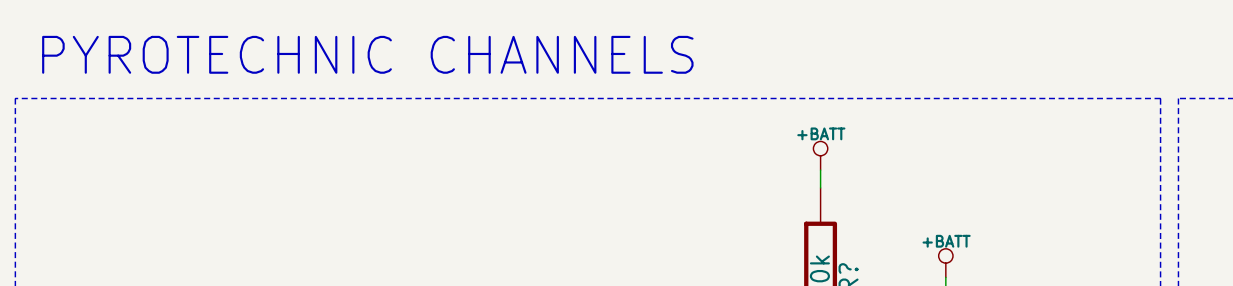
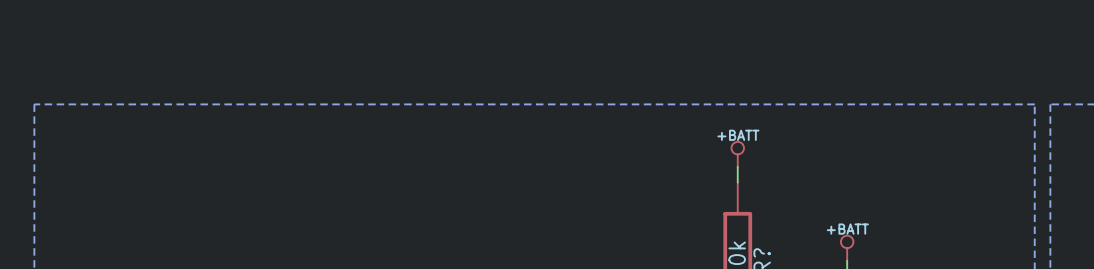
text: PYROTECHNIC CHANNELS (367, 54) -> none

